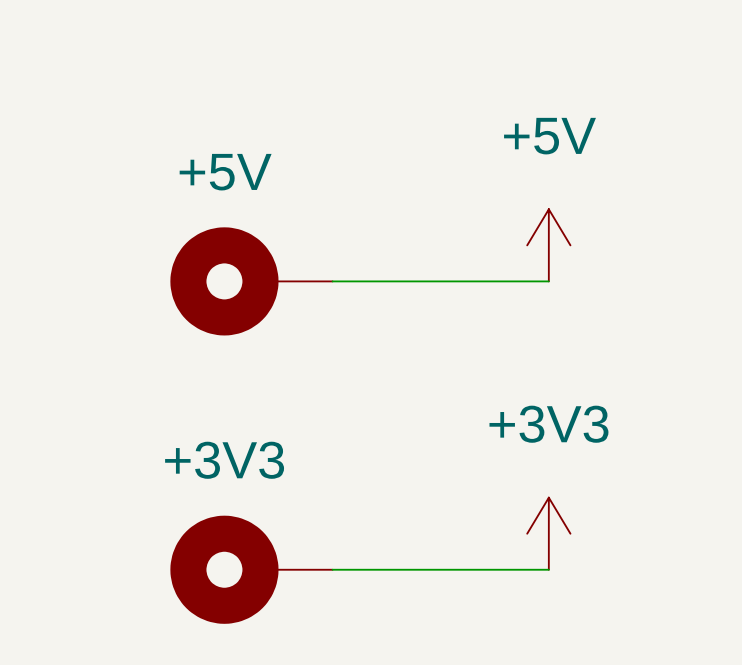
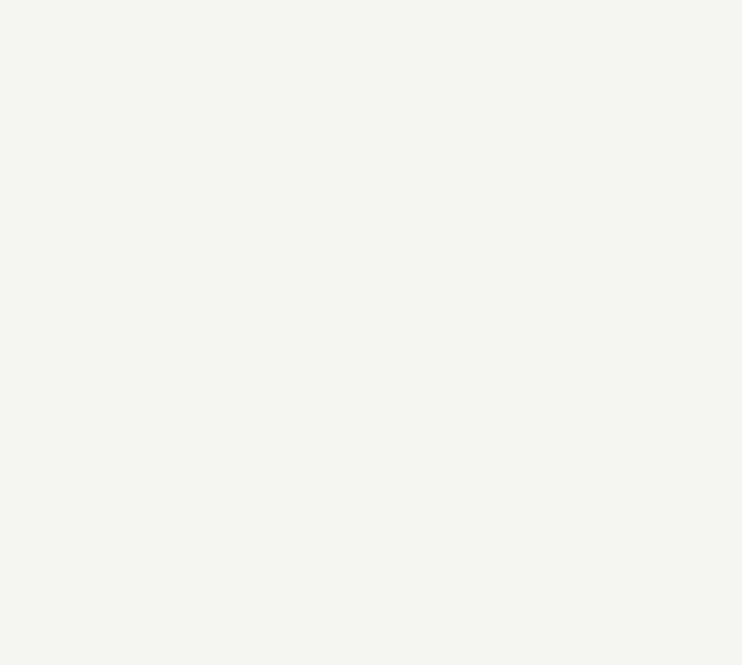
power symbol: +5V (548, 245) -> none
part: +5V (251, 281) -> none
wire: (332, 281) (548, 281) -> none
power symbol: +3V3 (548, 533) -> none
part: +3V3 (251, 569) -> none
wire: (332, 569) (548, 569) -> none

